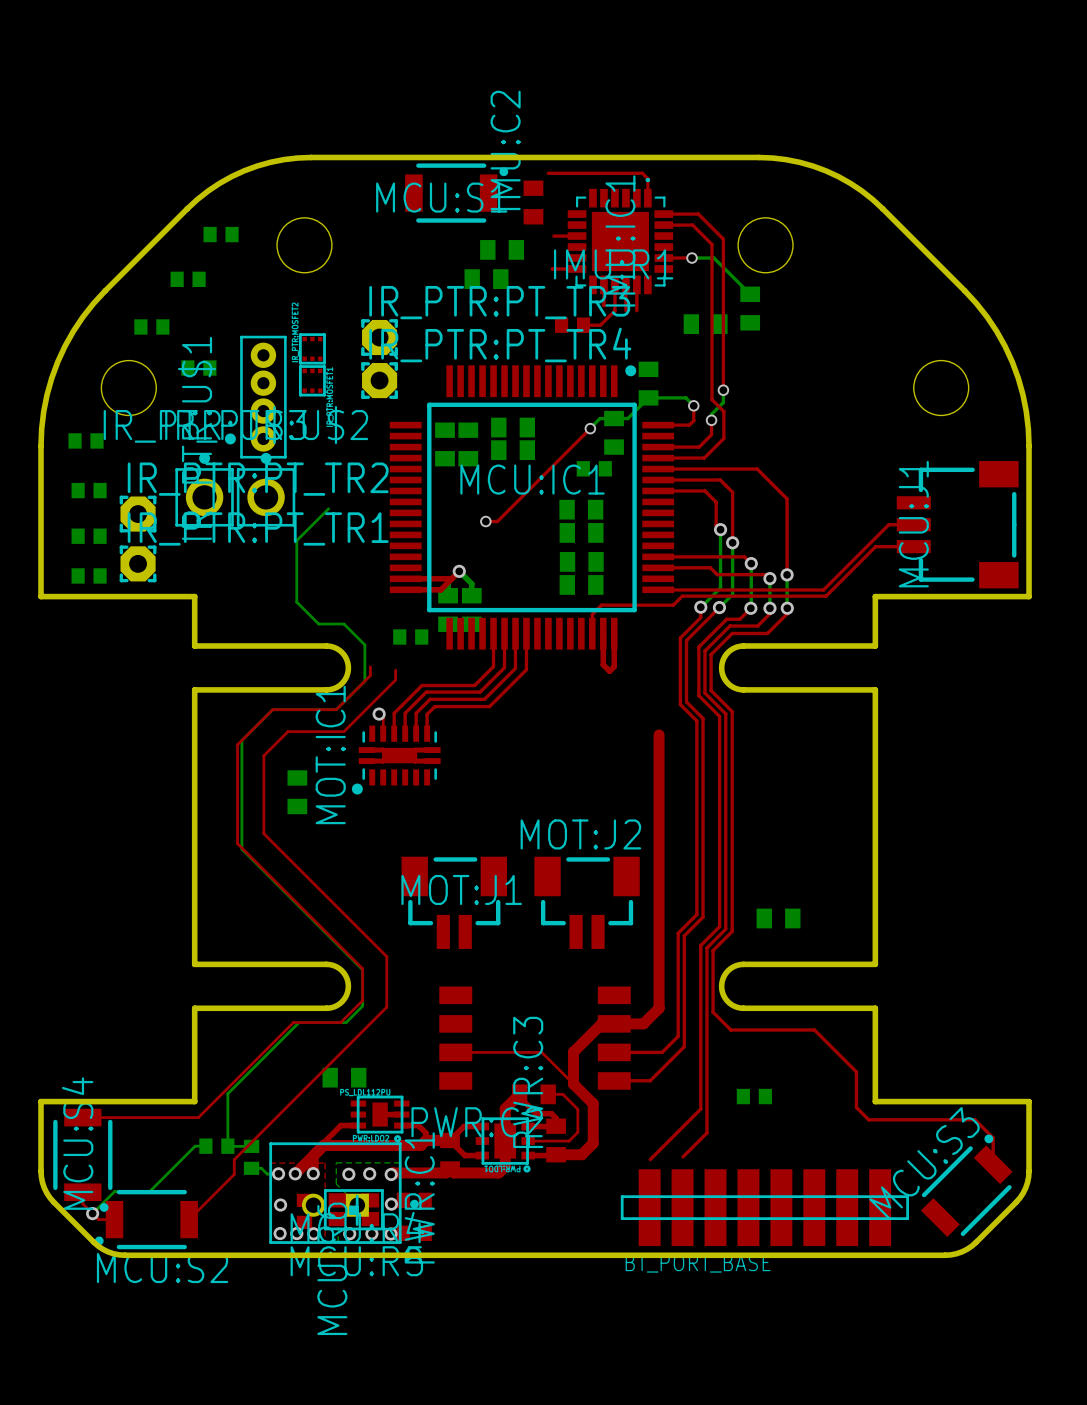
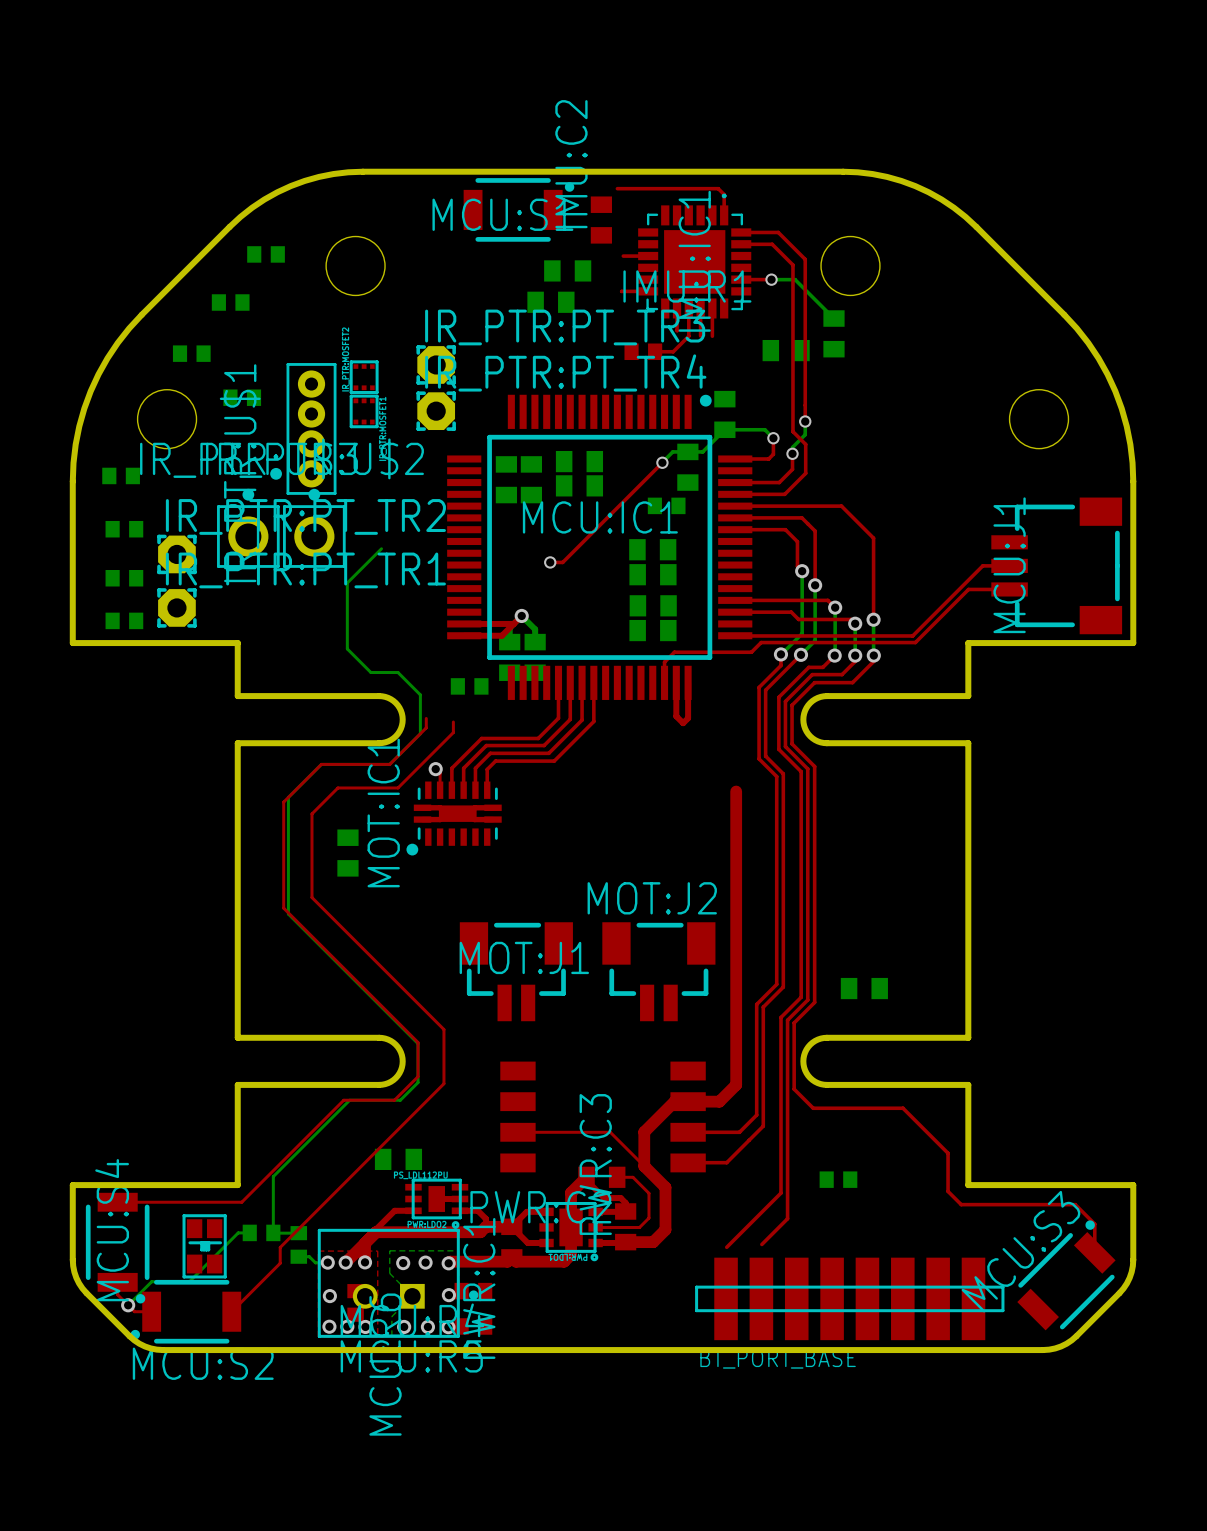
part rotation: 0° (353, 1209) -> 90° counterclockwise (204, 1246)
part position: (353, 1209) -> (204, 1246)

